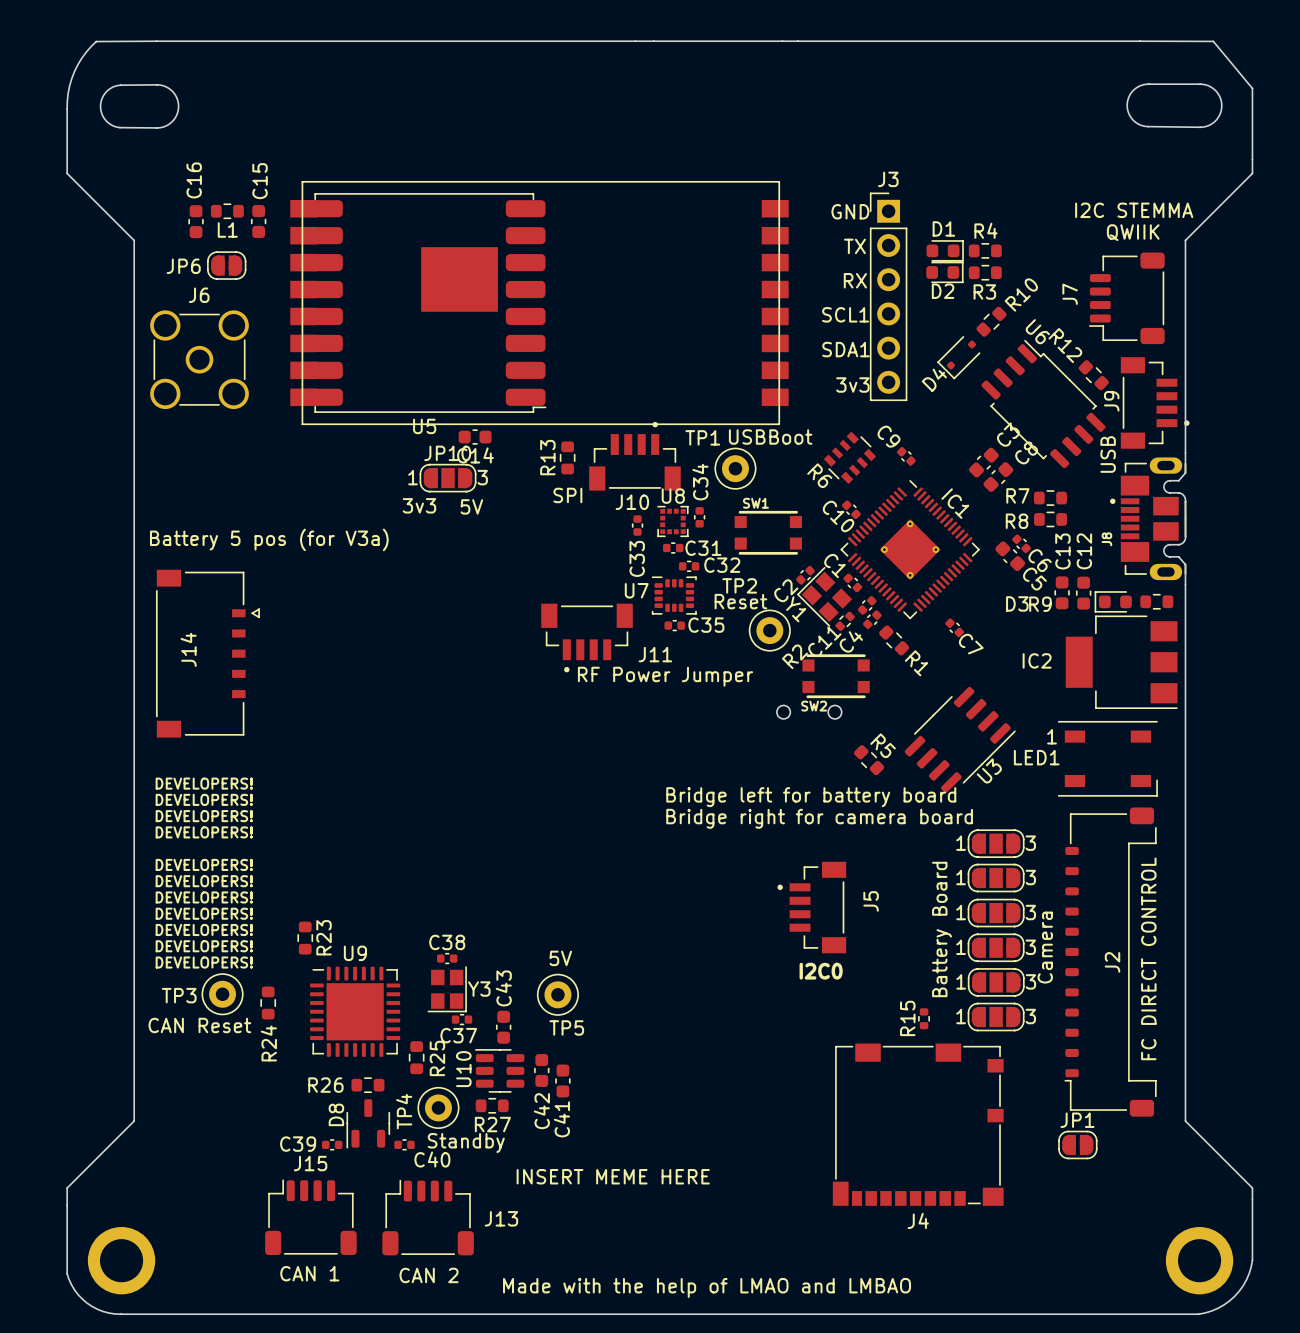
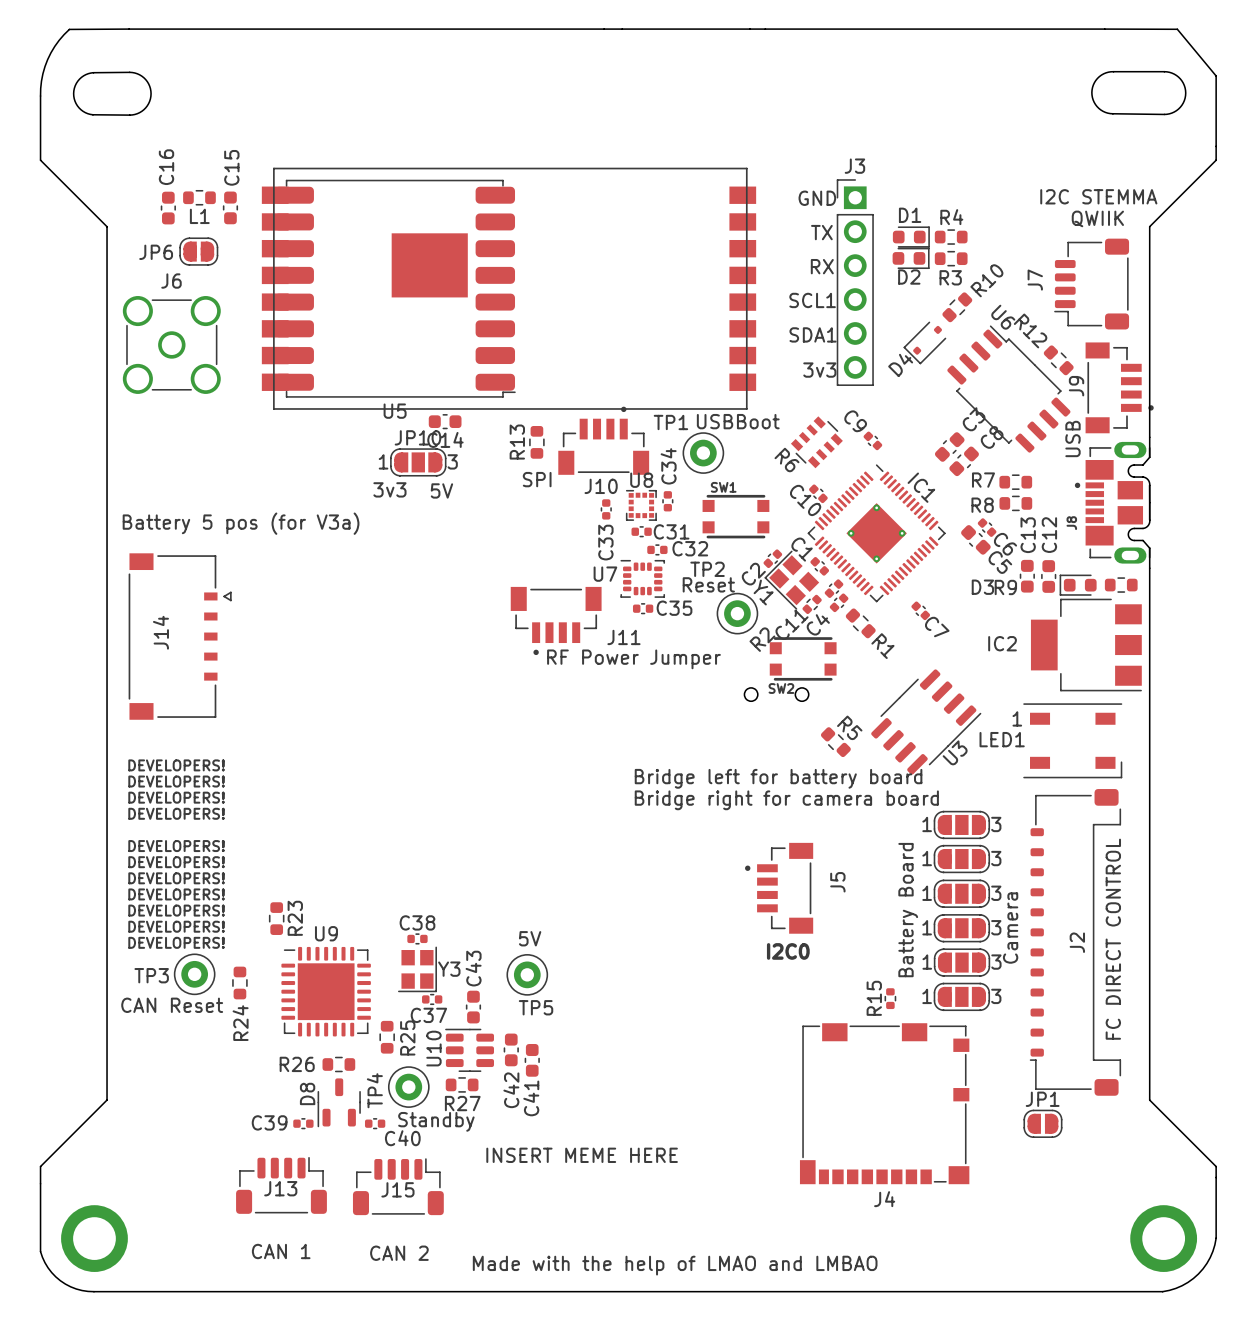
J15 name position: J15 (310, 1163) -> J15 (397, 1189)
J15 footprint: [265, 1179, 357, 1256] -> [352, 1158, 444, 1216]
J13 footprint: [382, 1179, 474, 1256] -> [236, 1156, 327, 1214]
J13 name position: J13 (501, 1218) -> J13 (280, 1188)

